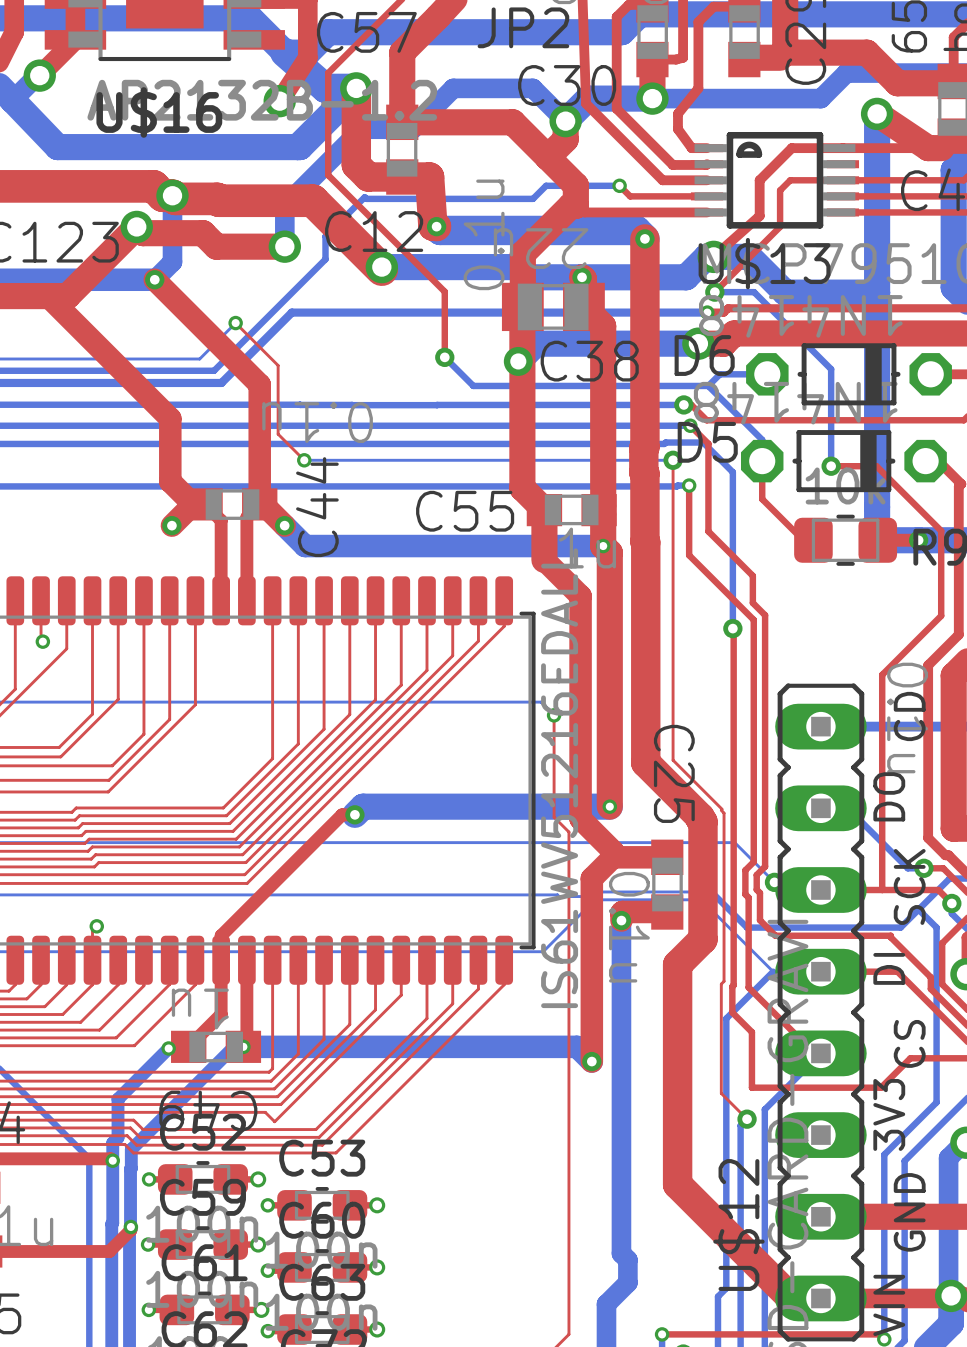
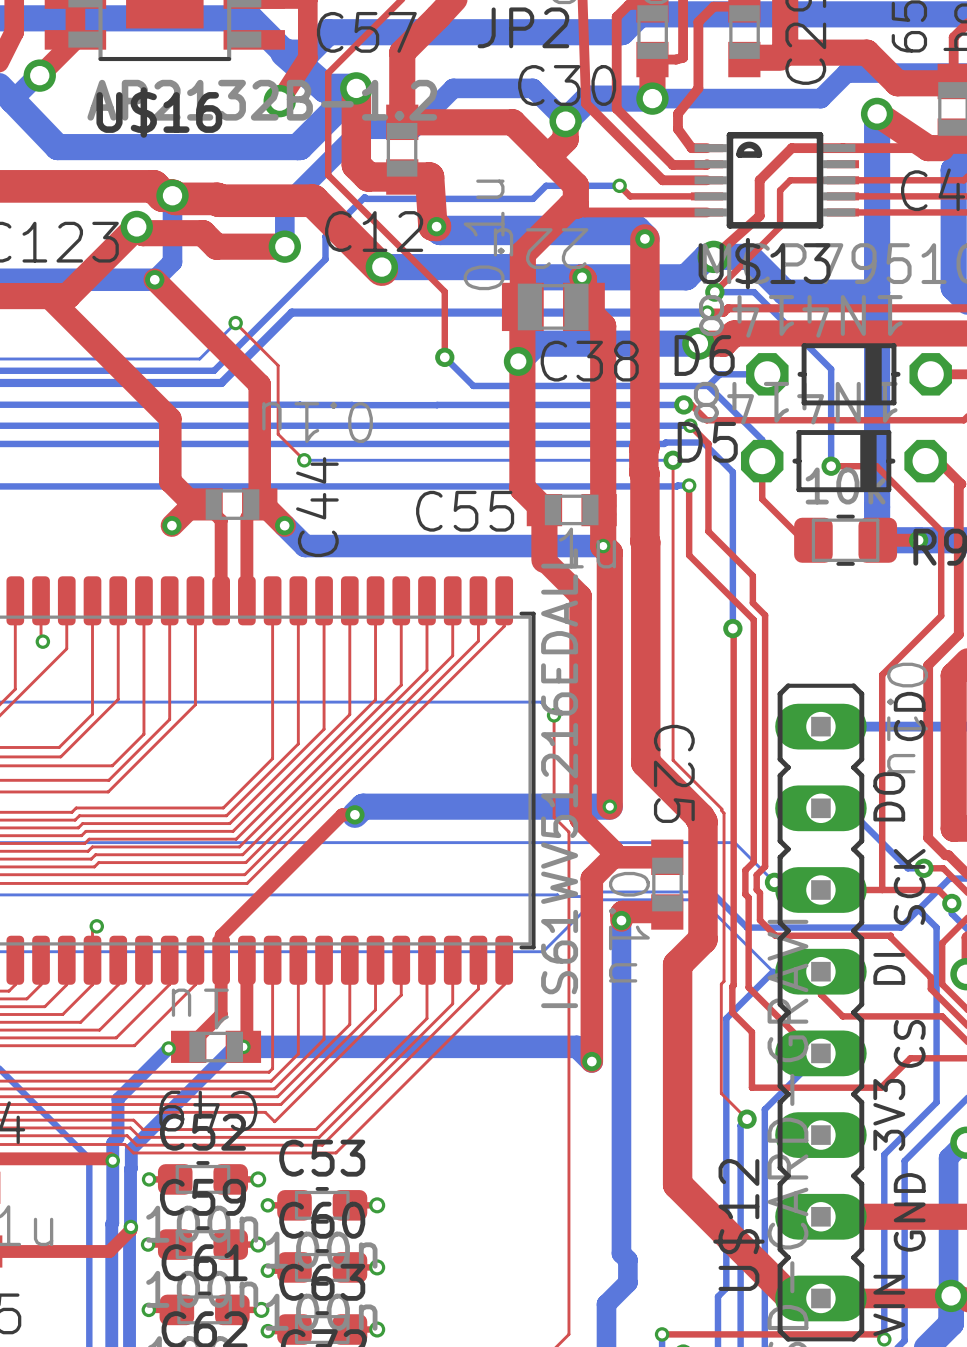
top track: (820, 971) (897, 971) (942, 1016) -> (820, 971) (820, 994) (842, 1016) (942, 1016)

